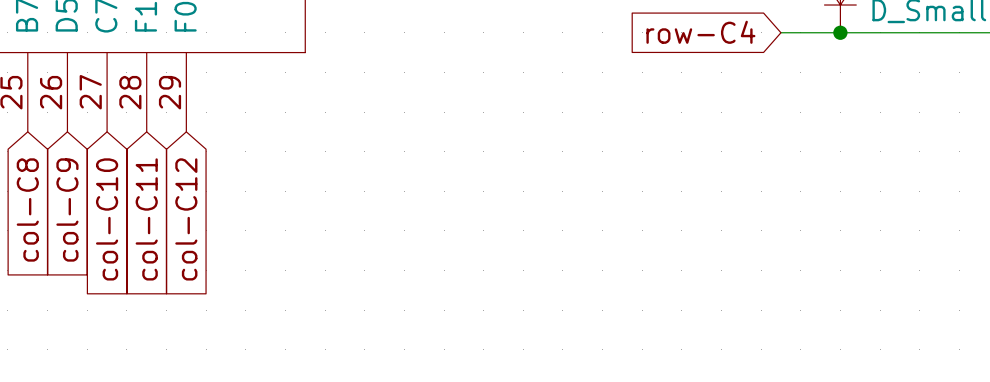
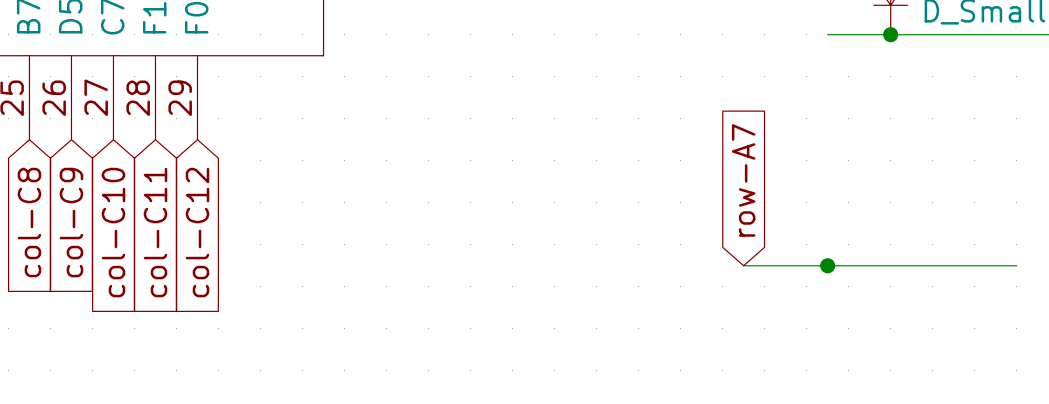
global label: row-C4 (700, 32) -> none
global label: none -> row-A7 (743, 180)
wire: none -> (743, 265) (1016, 265)
junction: none -> (827, 265)

